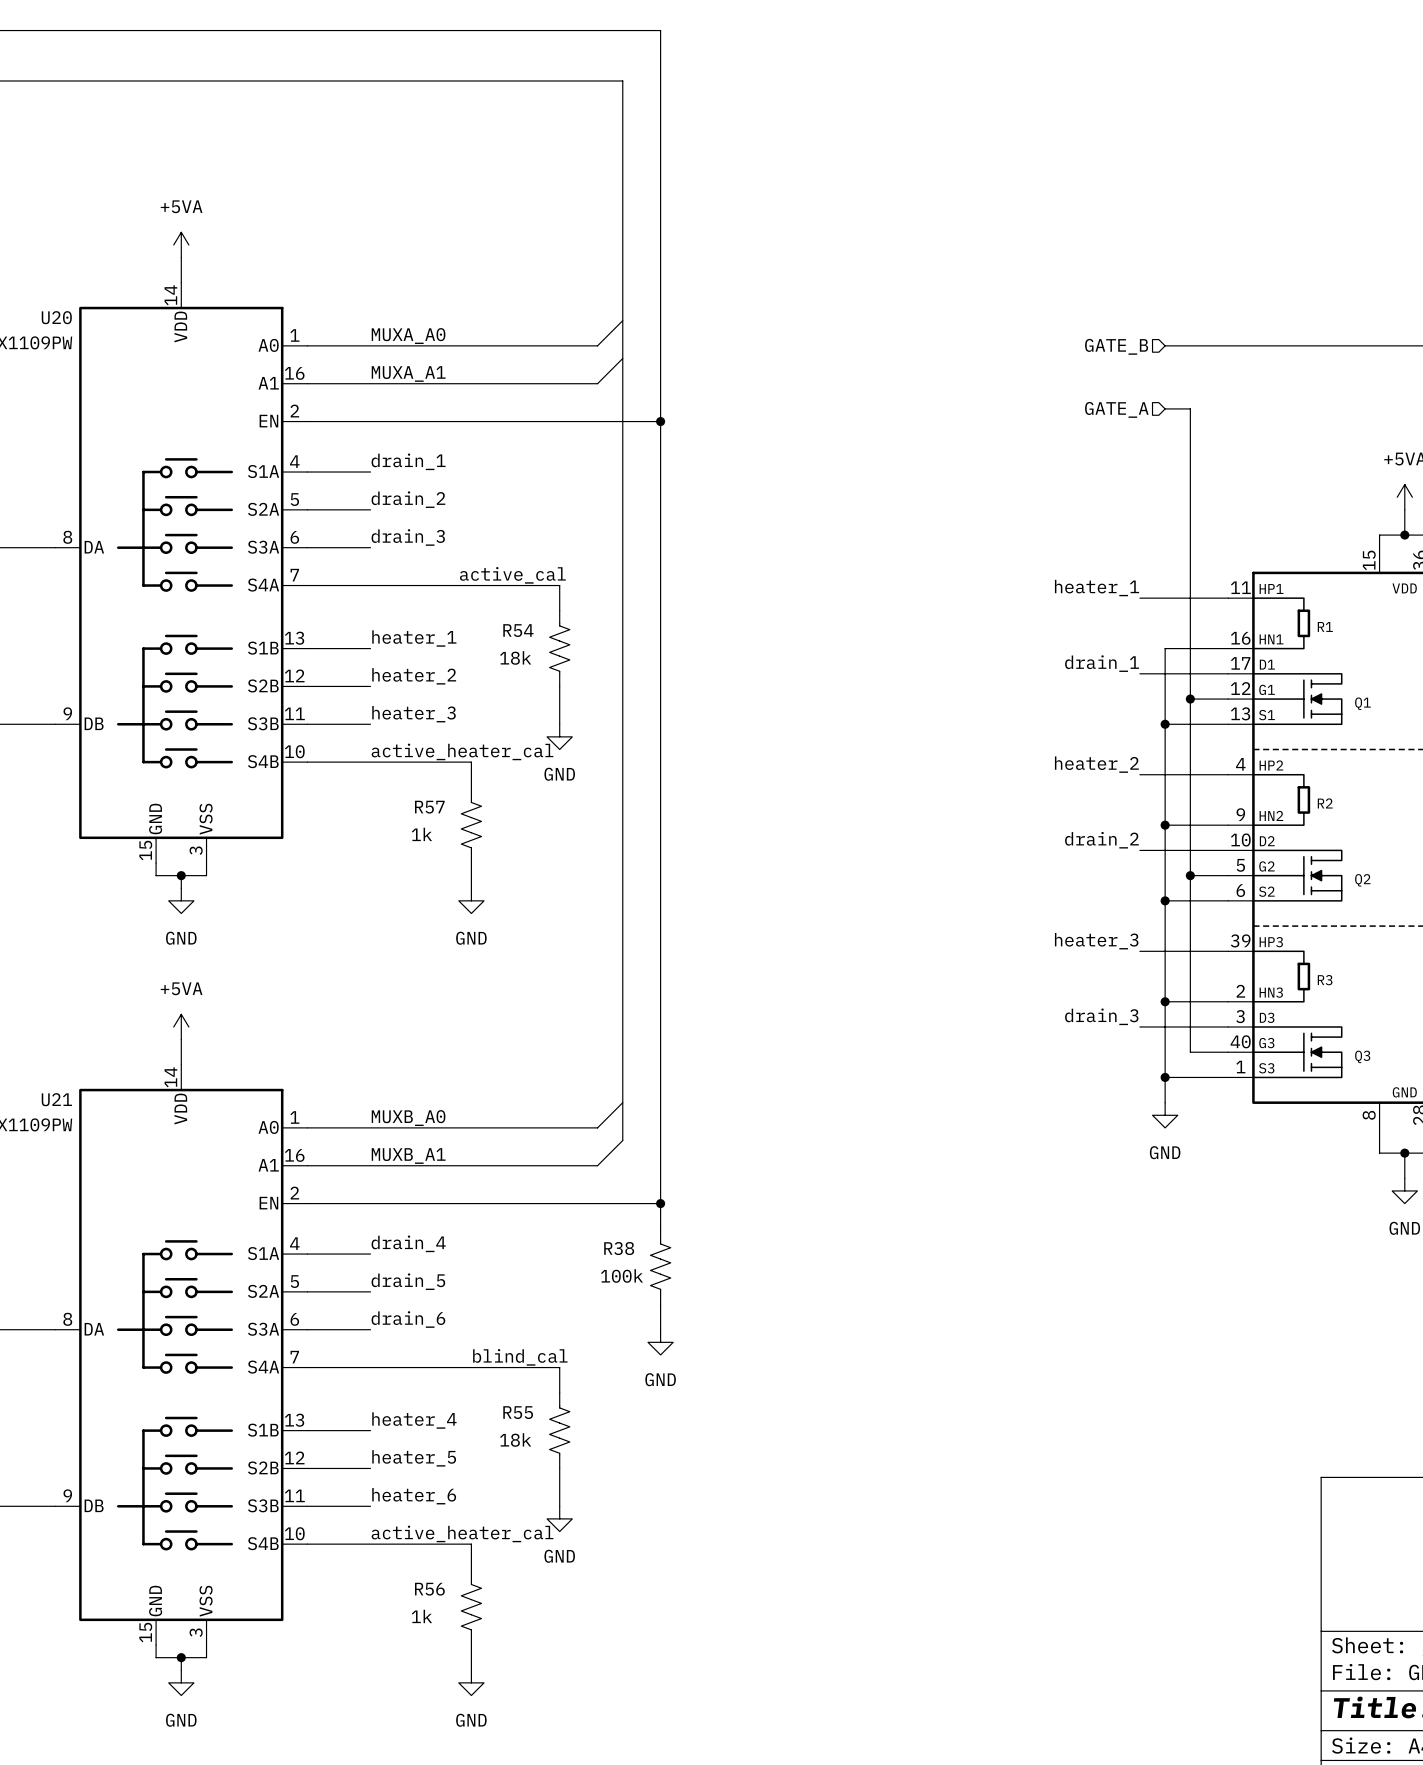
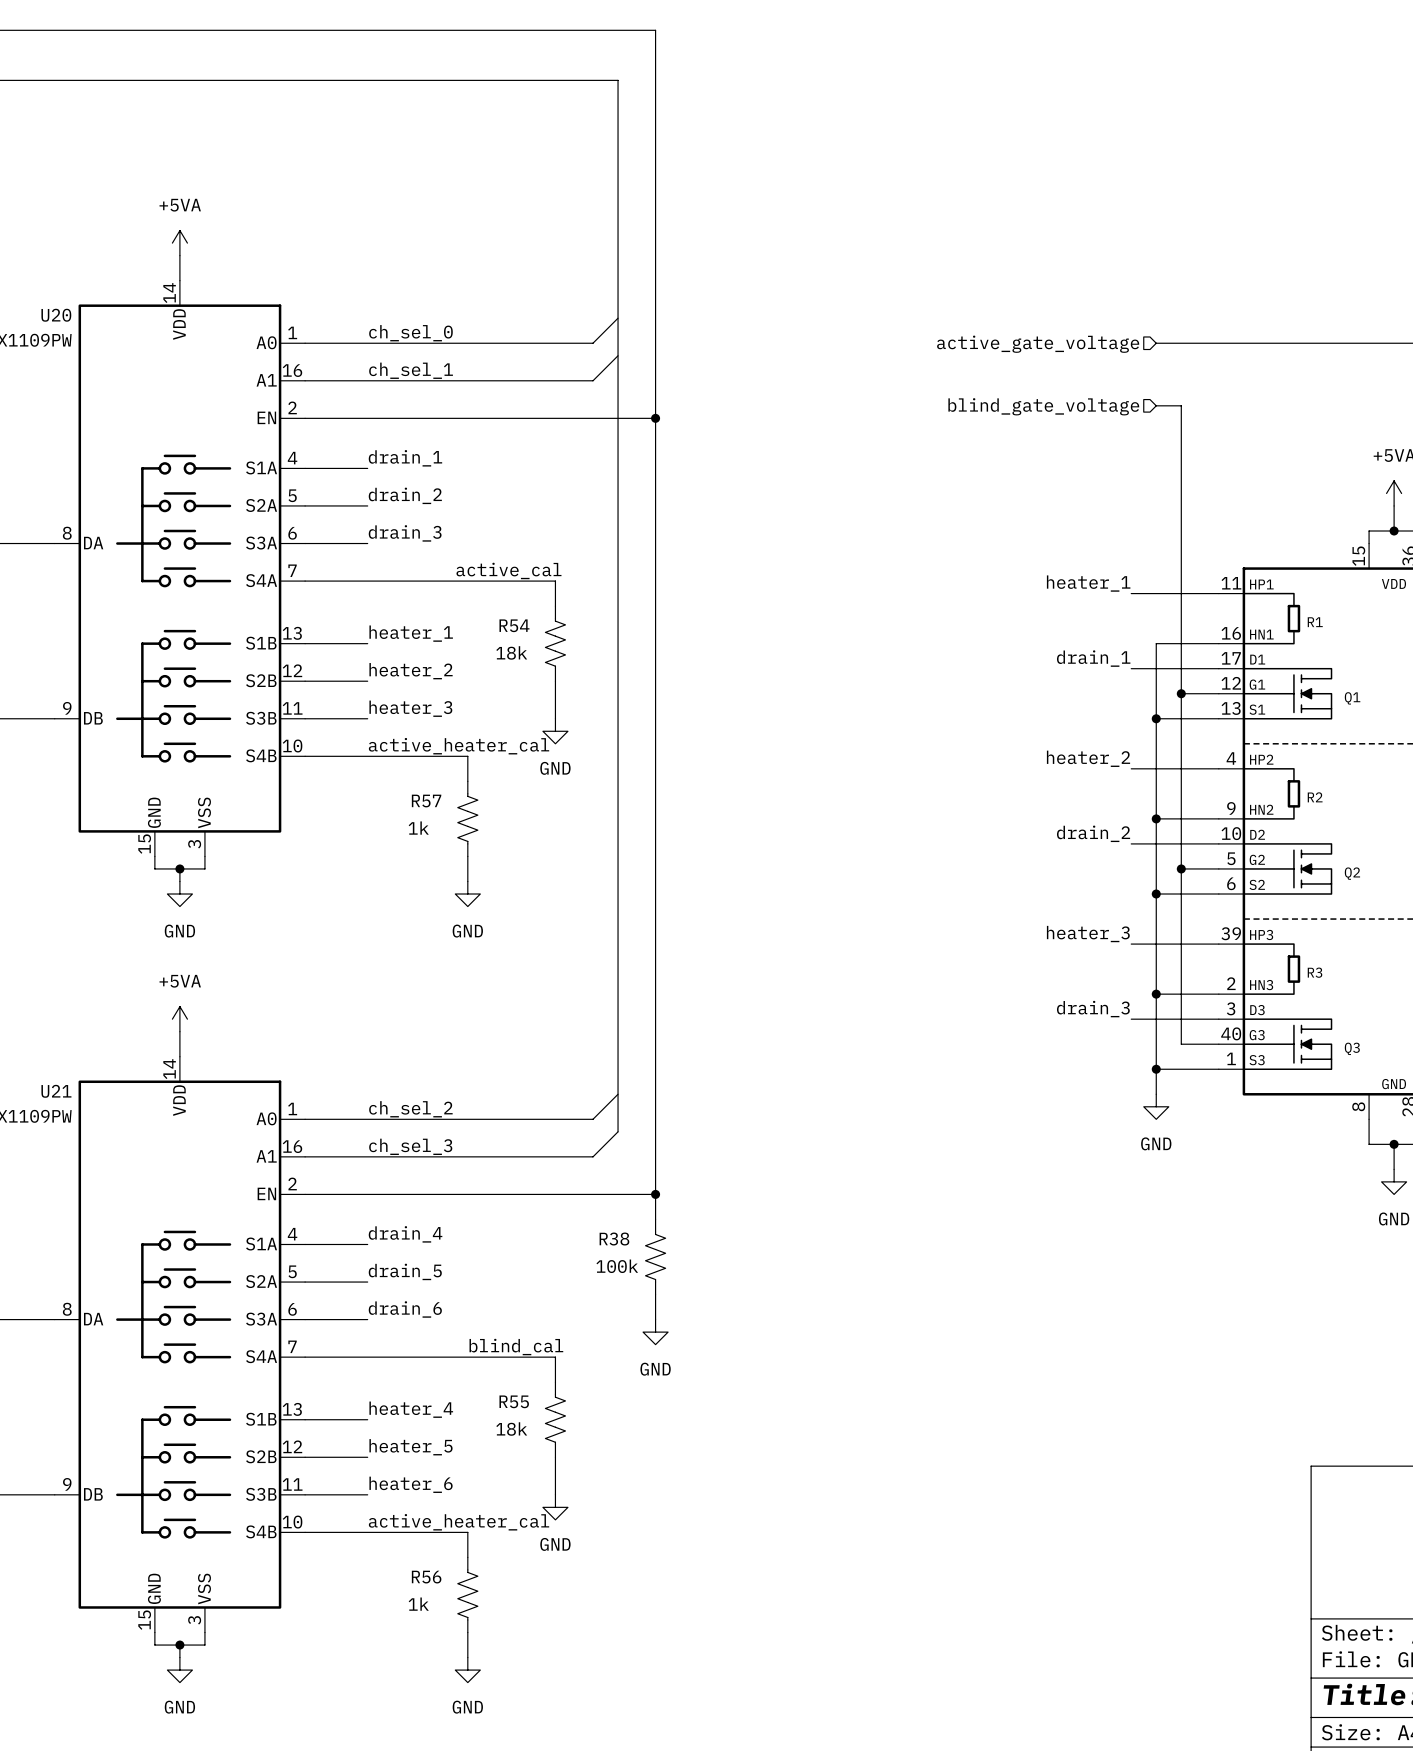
label: MUXA_A0 (408, 336) -> ch_sel_0 (410, 333)
hierarchical label: GATE_B (1116, 346) -> active_gate_voltage (1038, 344)
label: MUXA_A1 (408, 373) -> ch_sel_1 (411, 370)
hierarchical label: GATE_A (1116, 409) -> blind_gate_voltage (1043, 406)
label: MUXB_A0 (408, 1118) -> ch_sel_2 (410, 1109)
label: MUXB_A1 (408, 1156) -> ch_sel_3 (410, 1146)

